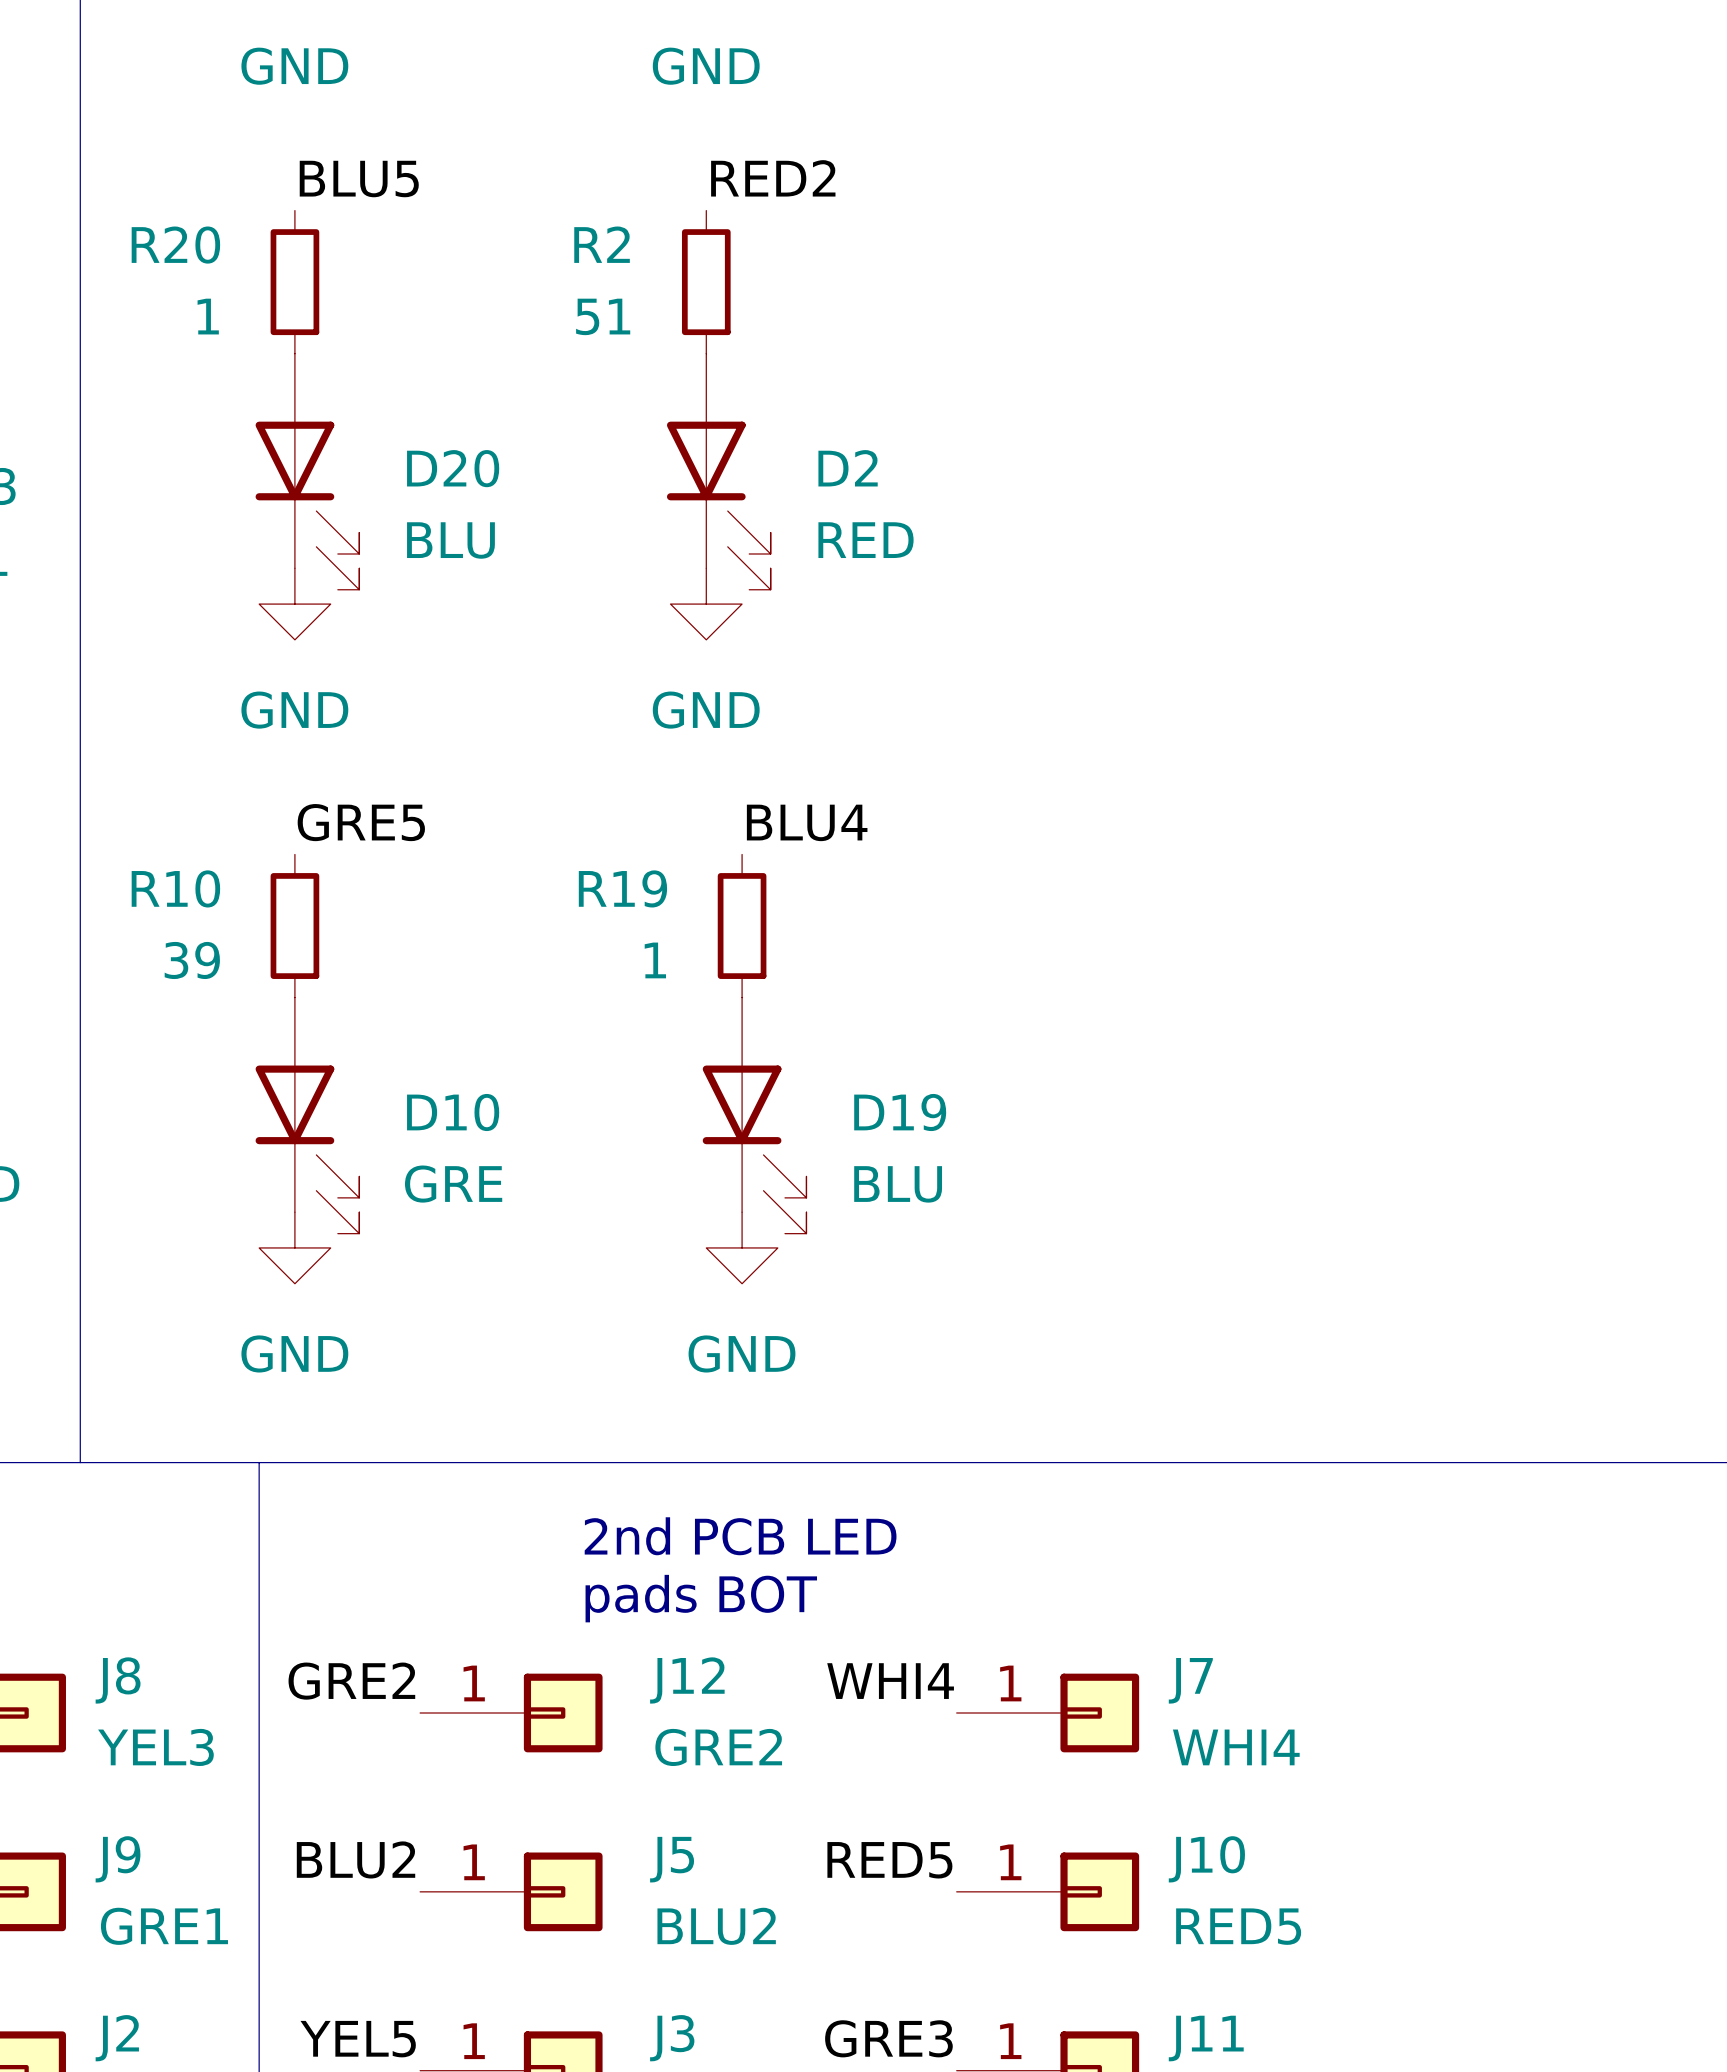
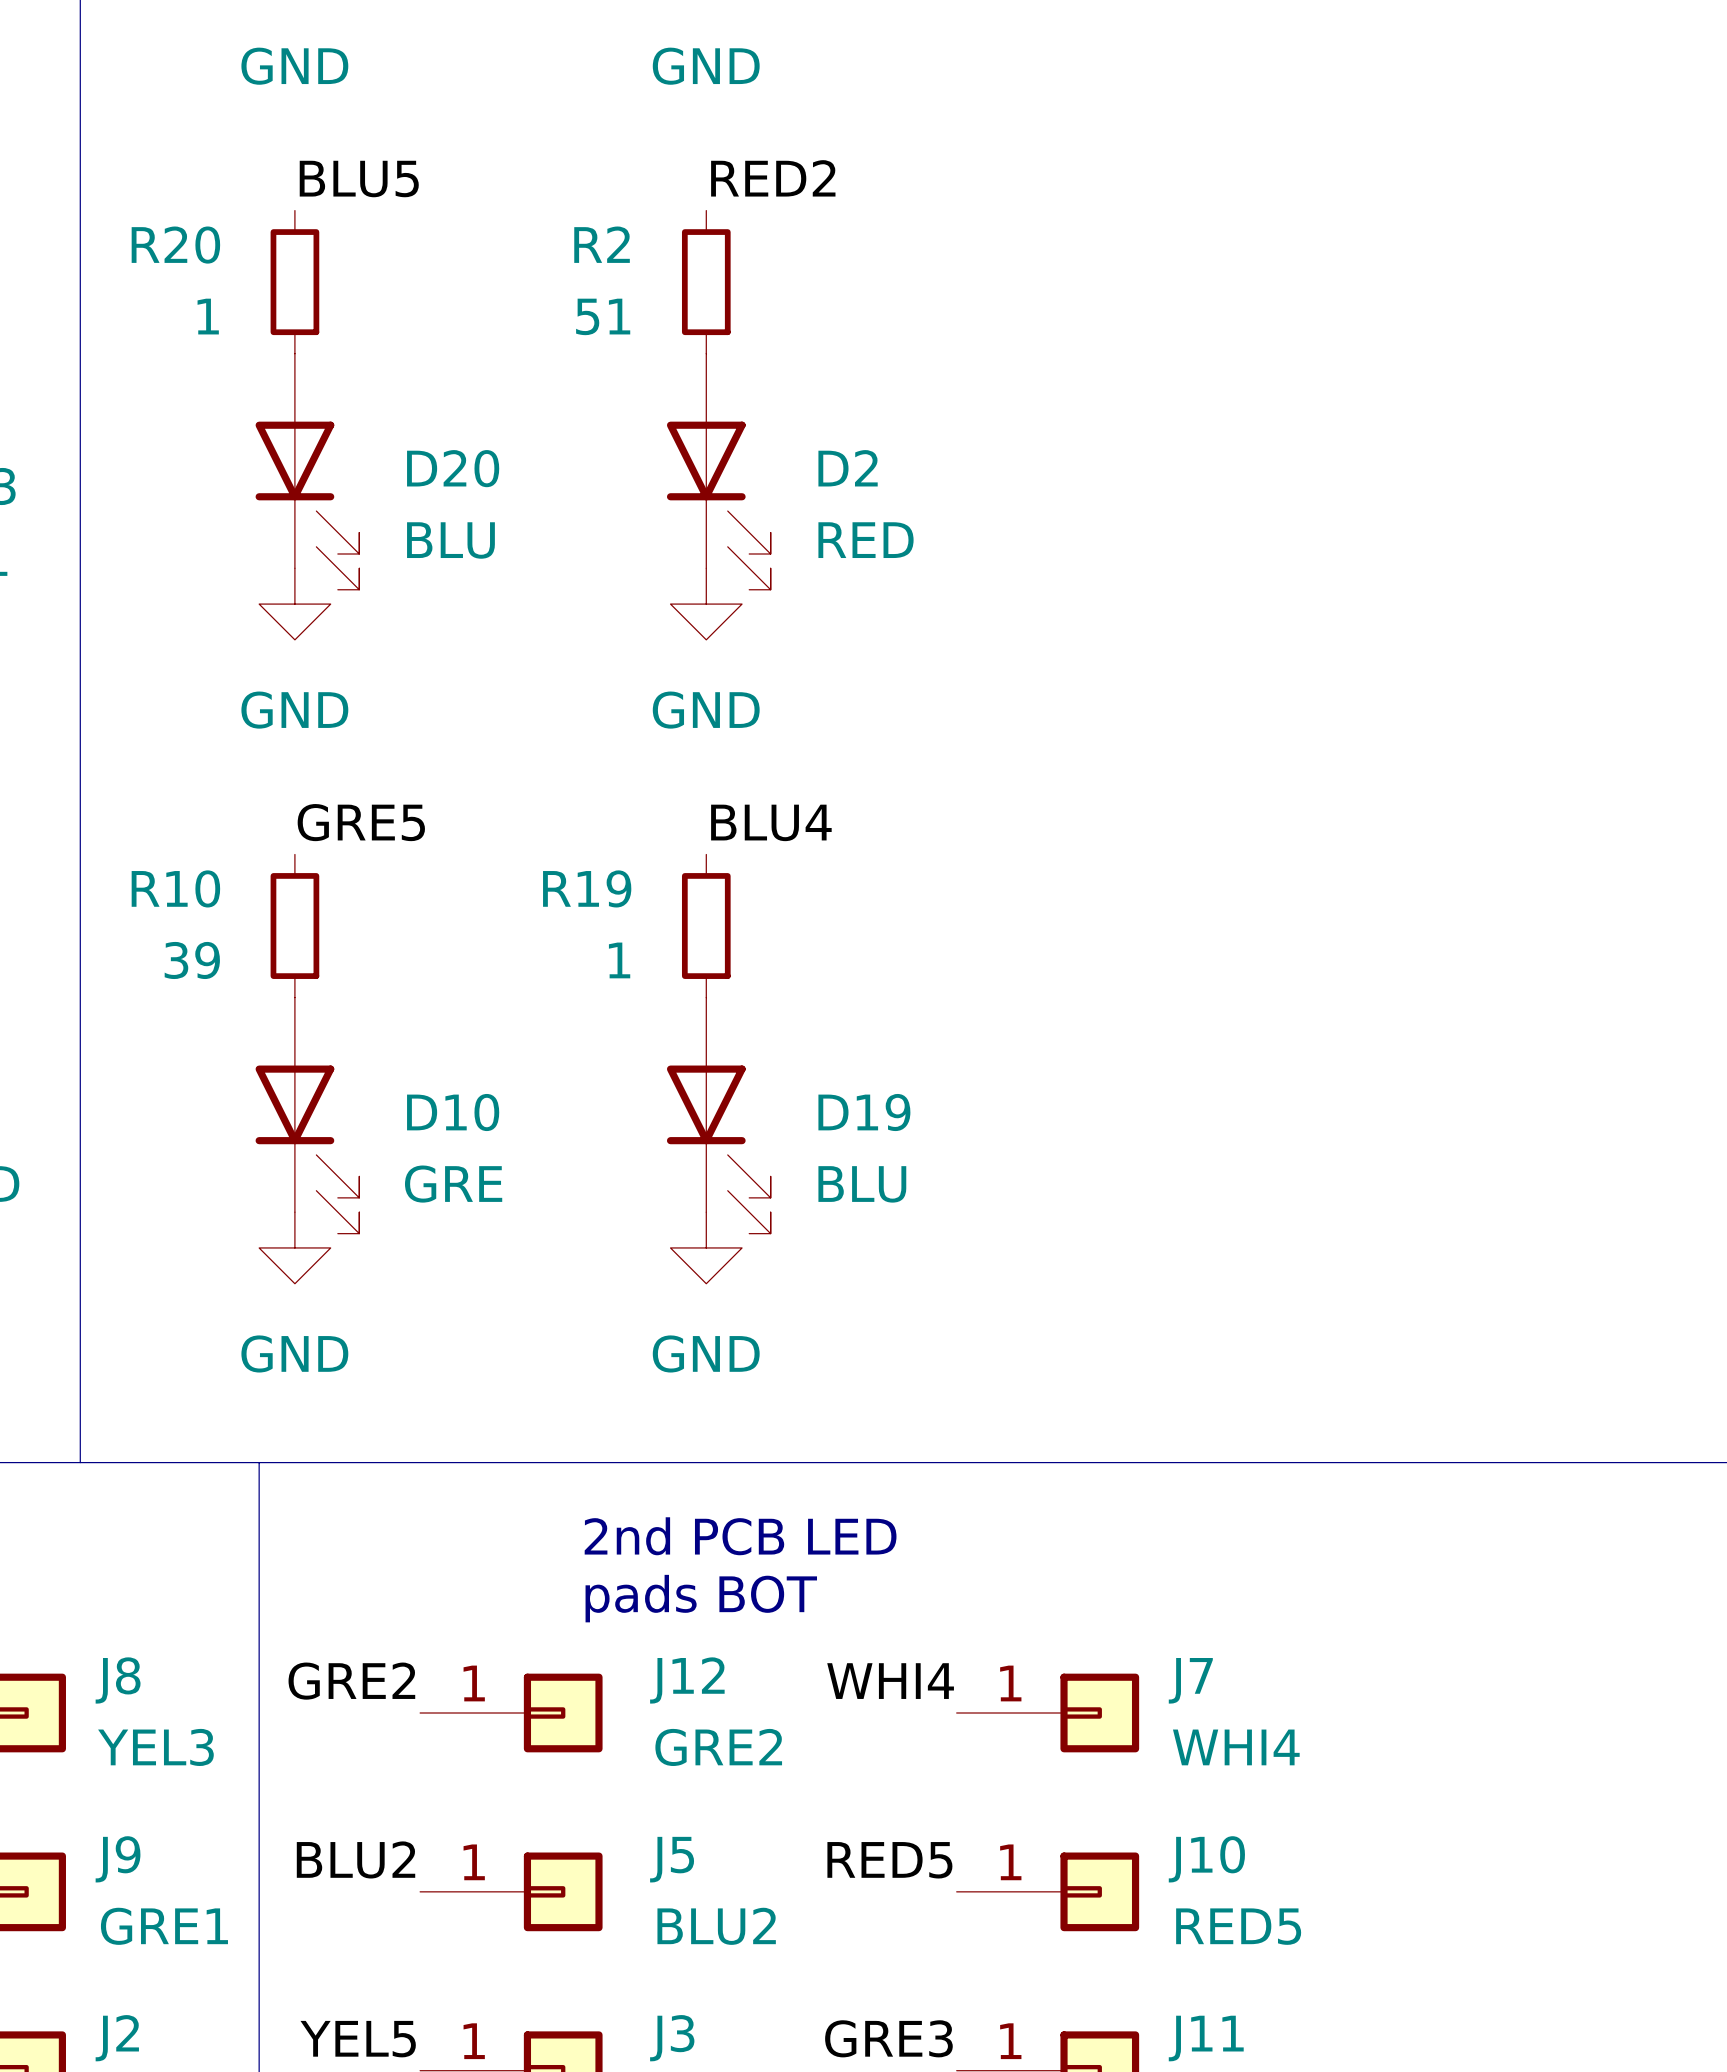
label position: BLU4 (807, 822) -> BLU4 (771, 822)
R19 position: (742, 926) -> (706, 926)
D19 position: (754, 1115) -> (718, 1115)
power symbol position: GND (742, 1247) -> GND (706, 1247)

